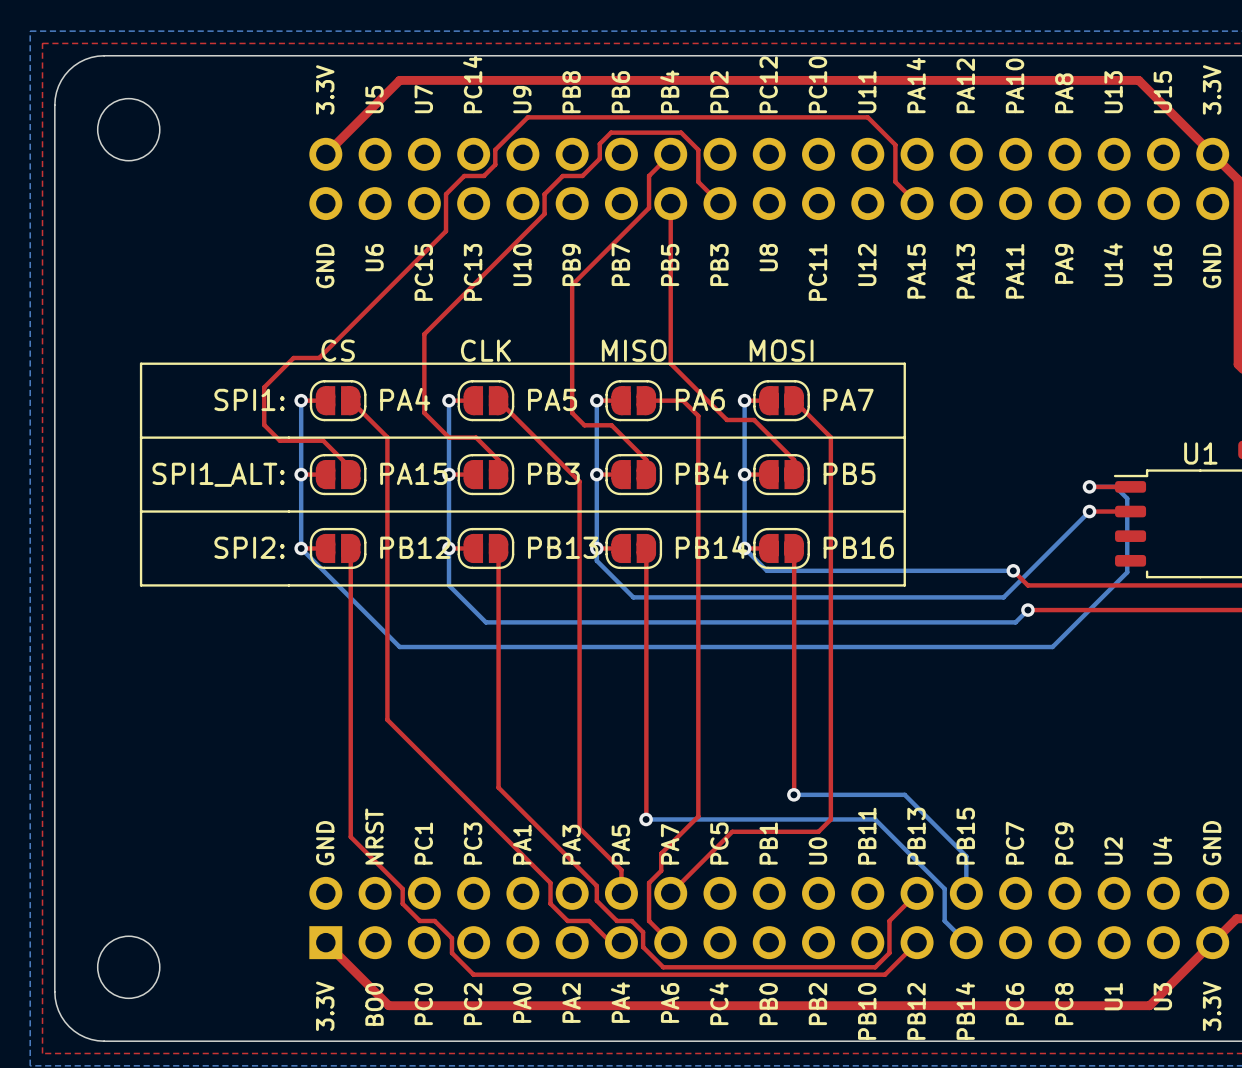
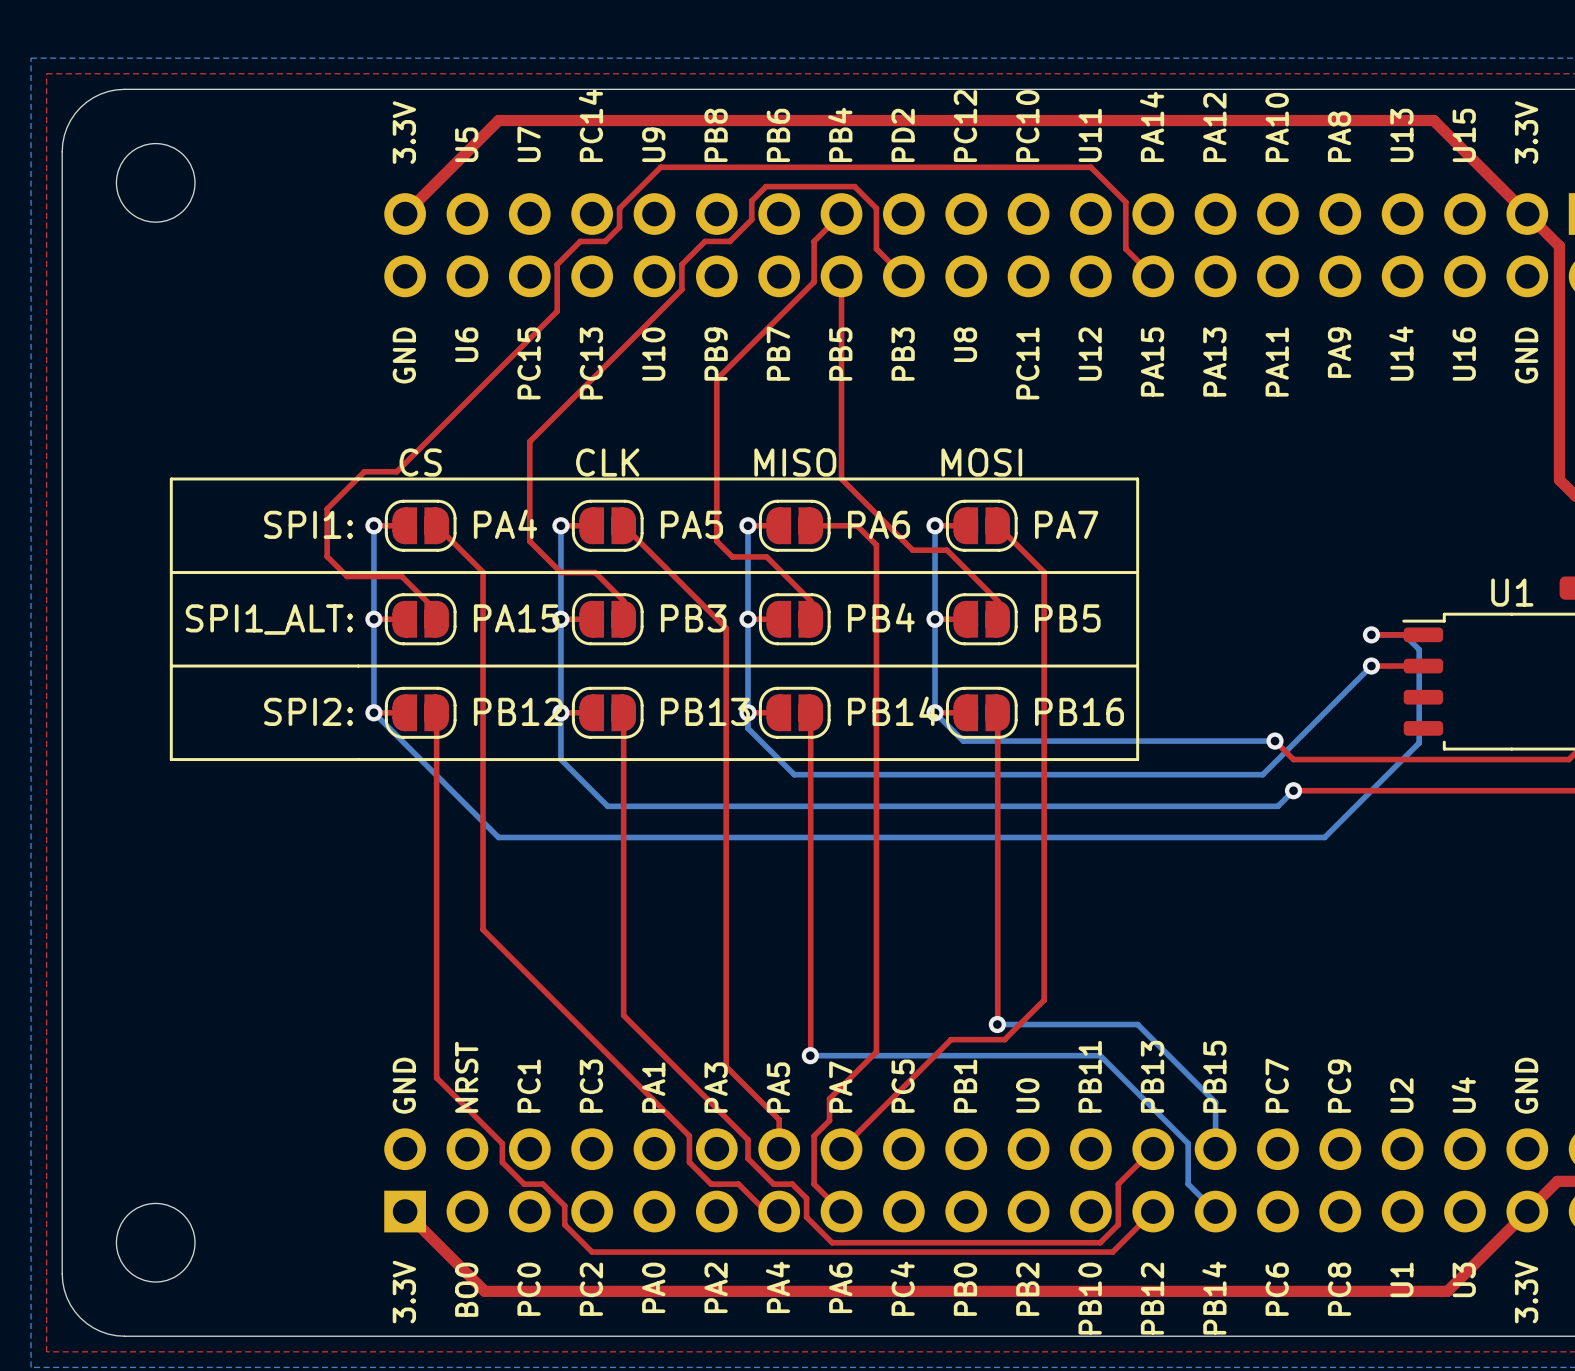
top track: (830, 775) (830, 819) (818, 831) (732, 831) -> (1044, 1000) (1004, 1039) (951, 1039) (919, 1071)

